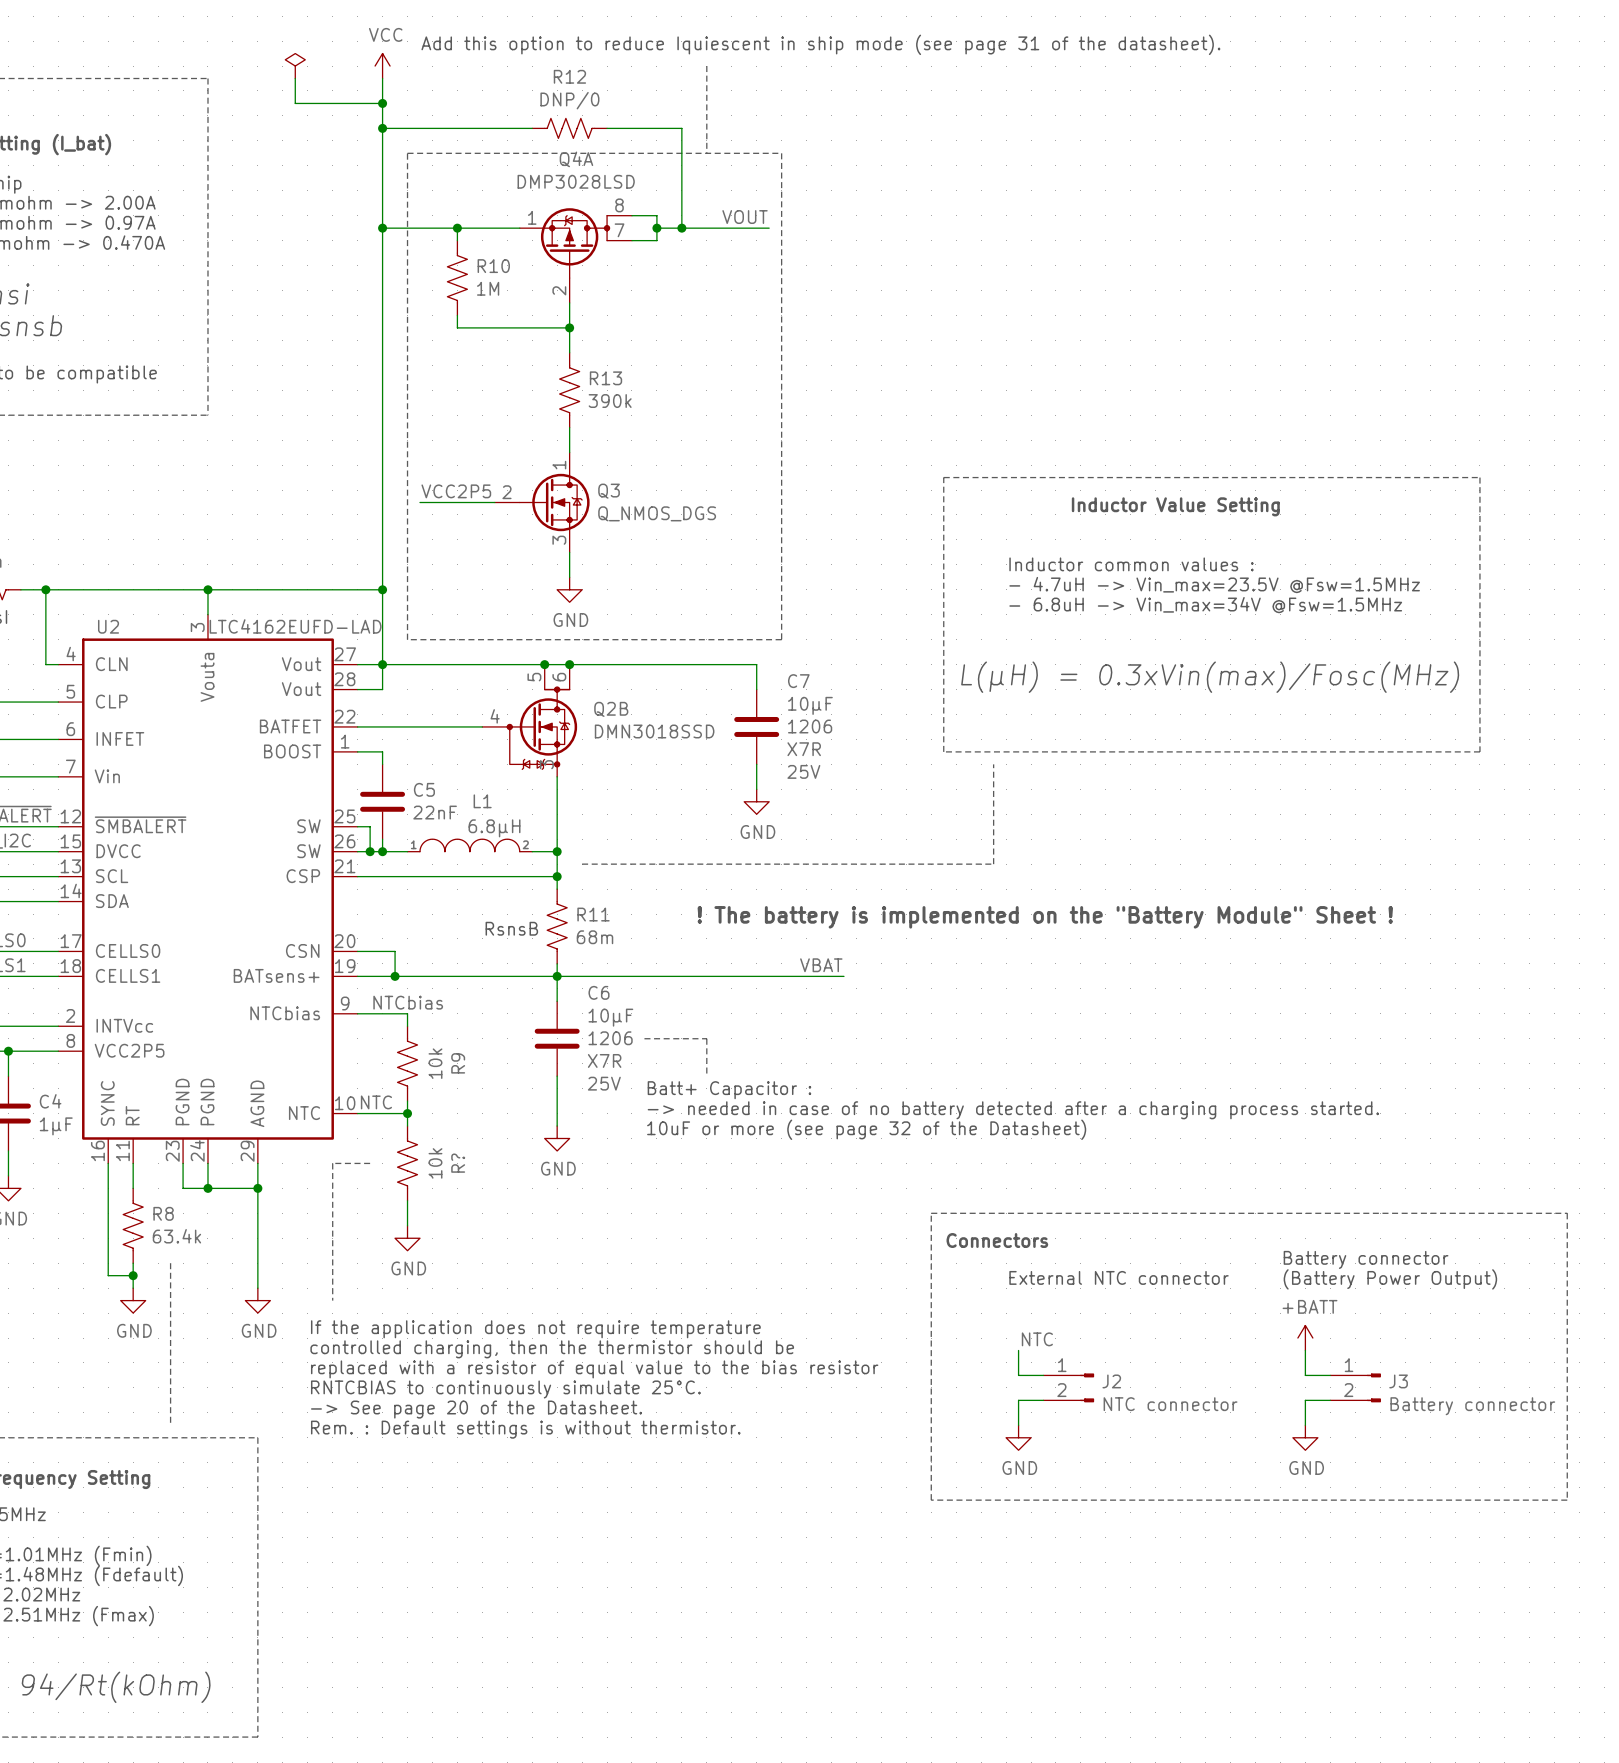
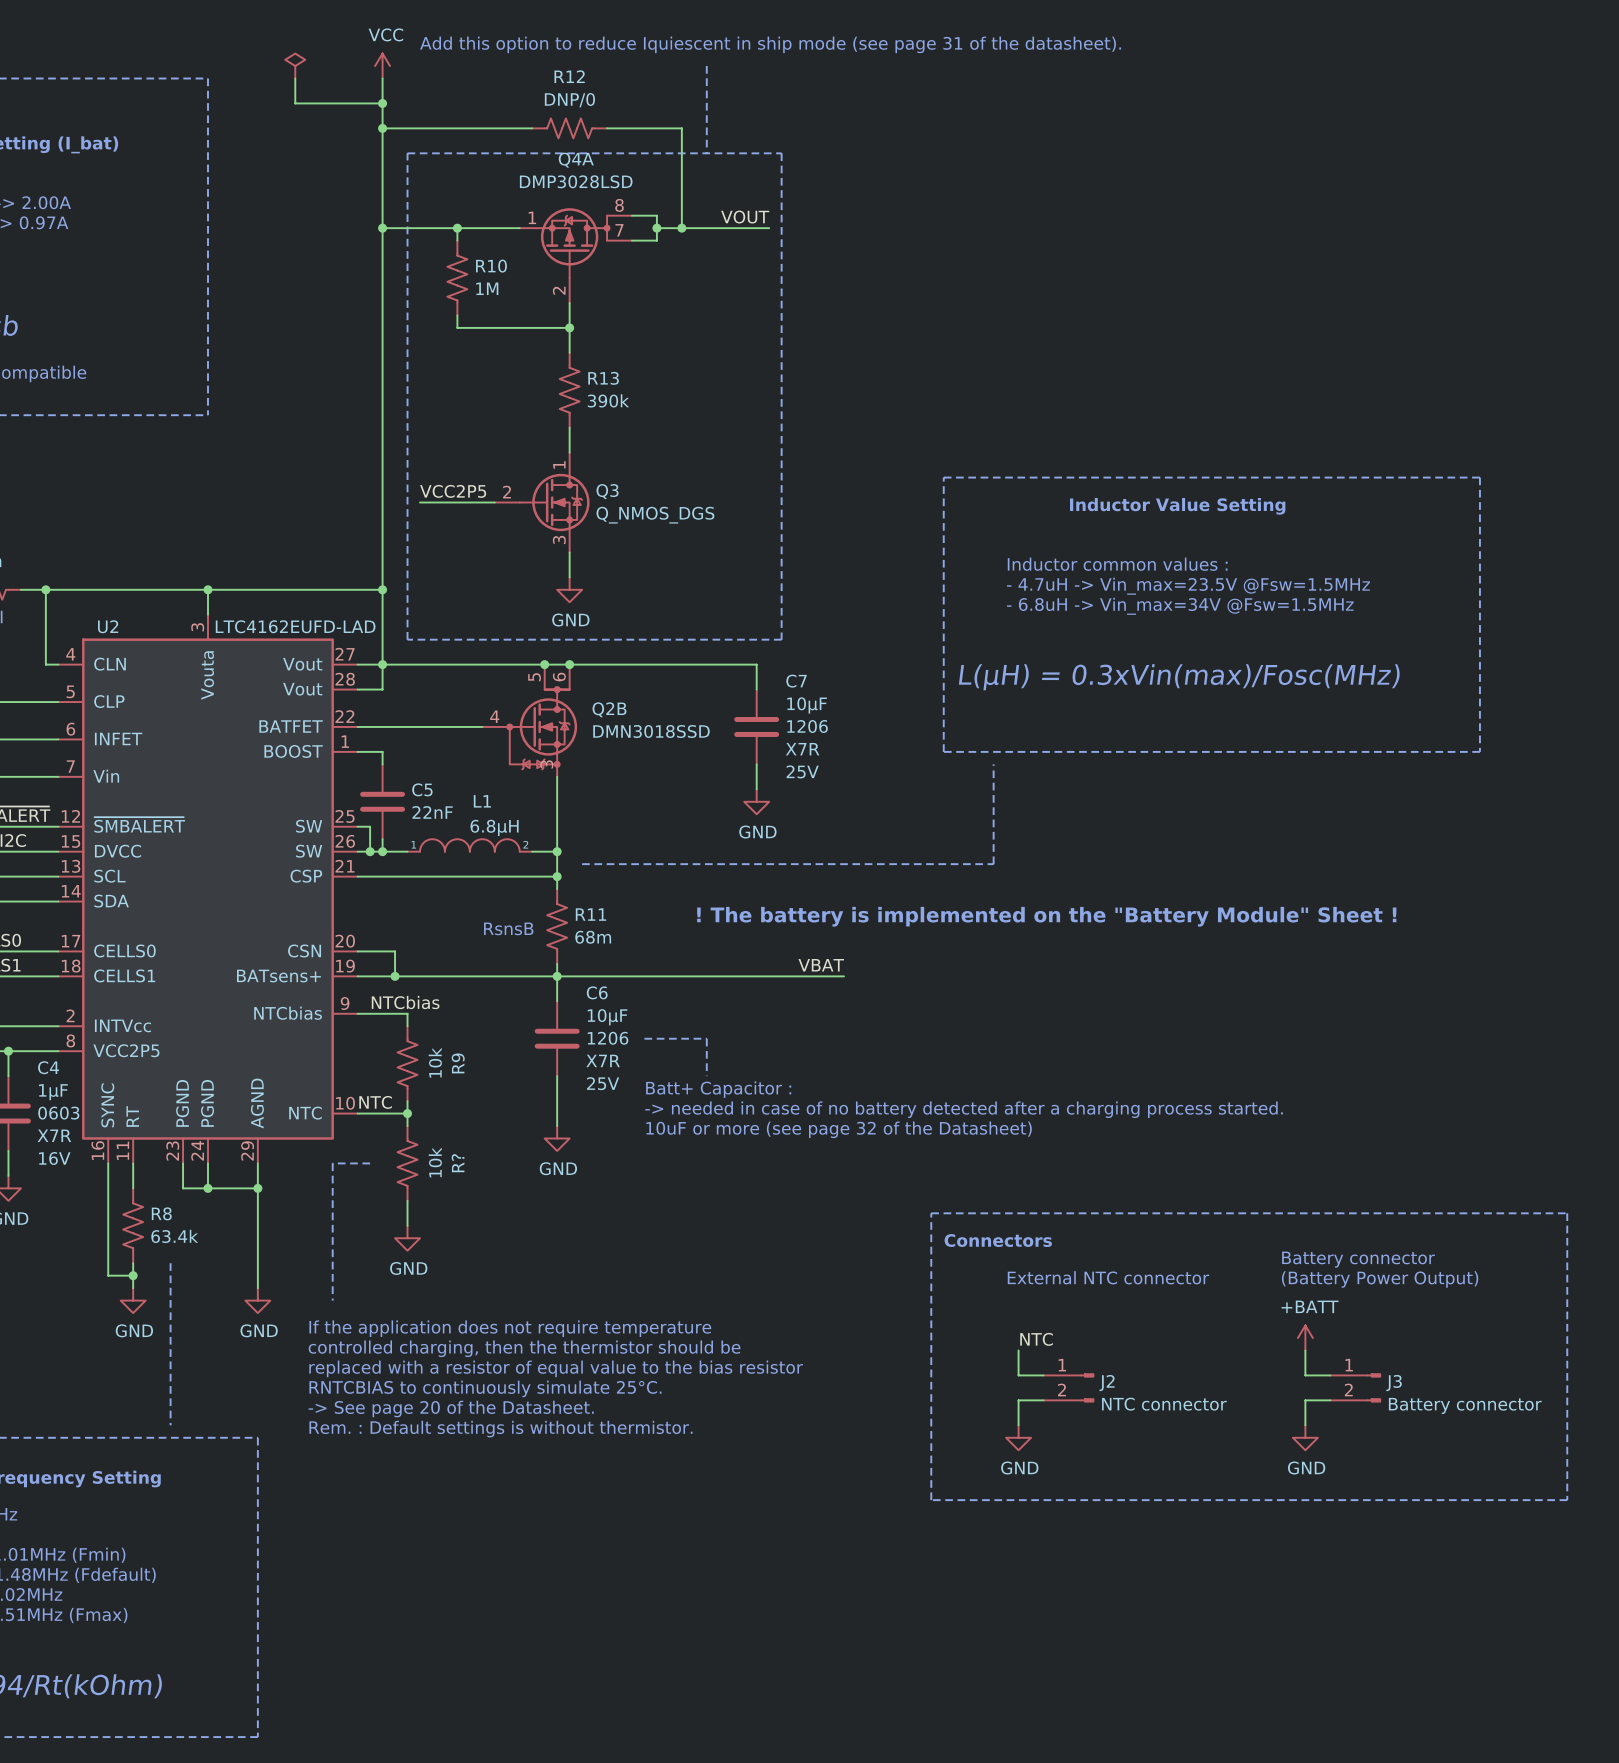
C4 text: none -> 1µF (53, 1092)
C4 name position: C4 (50, 1101) -> C4 (48, 1067)
C4 text: none -> 0603 (58, 1113)
C4 value: 1µF (56, 1126) -> none
C4 text: none -> X7R (54, 1135)
C4 text: none -> 16V (54, 1158)

